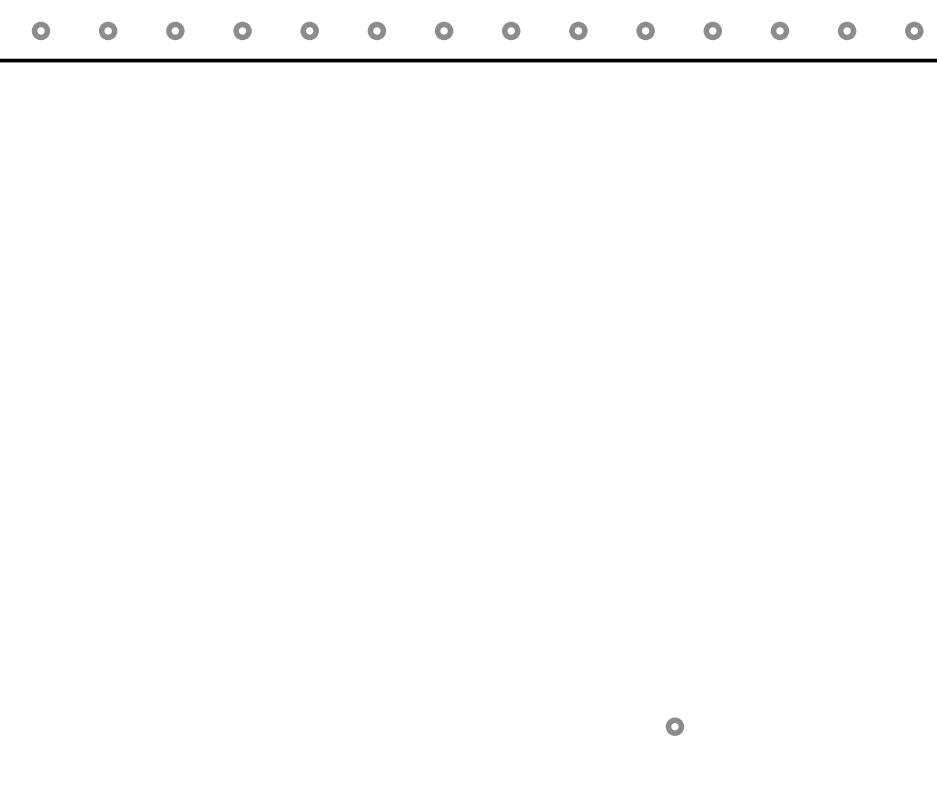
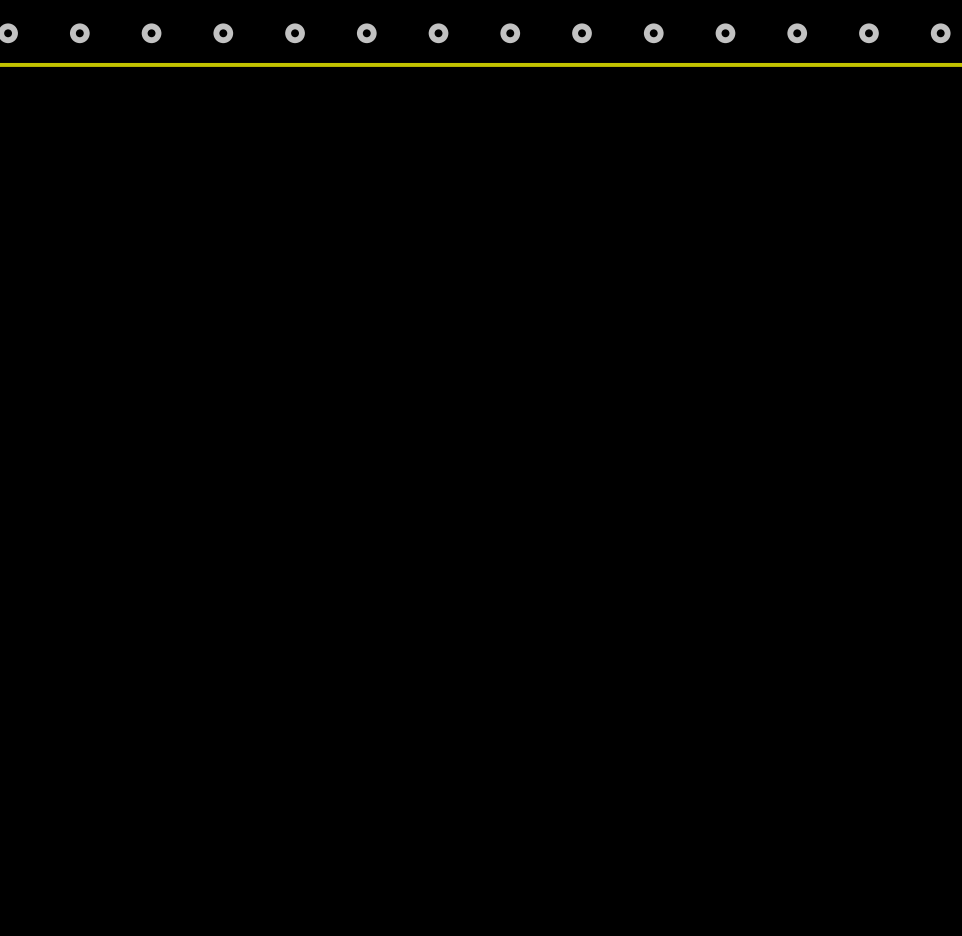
via: (674, 726) -> none

